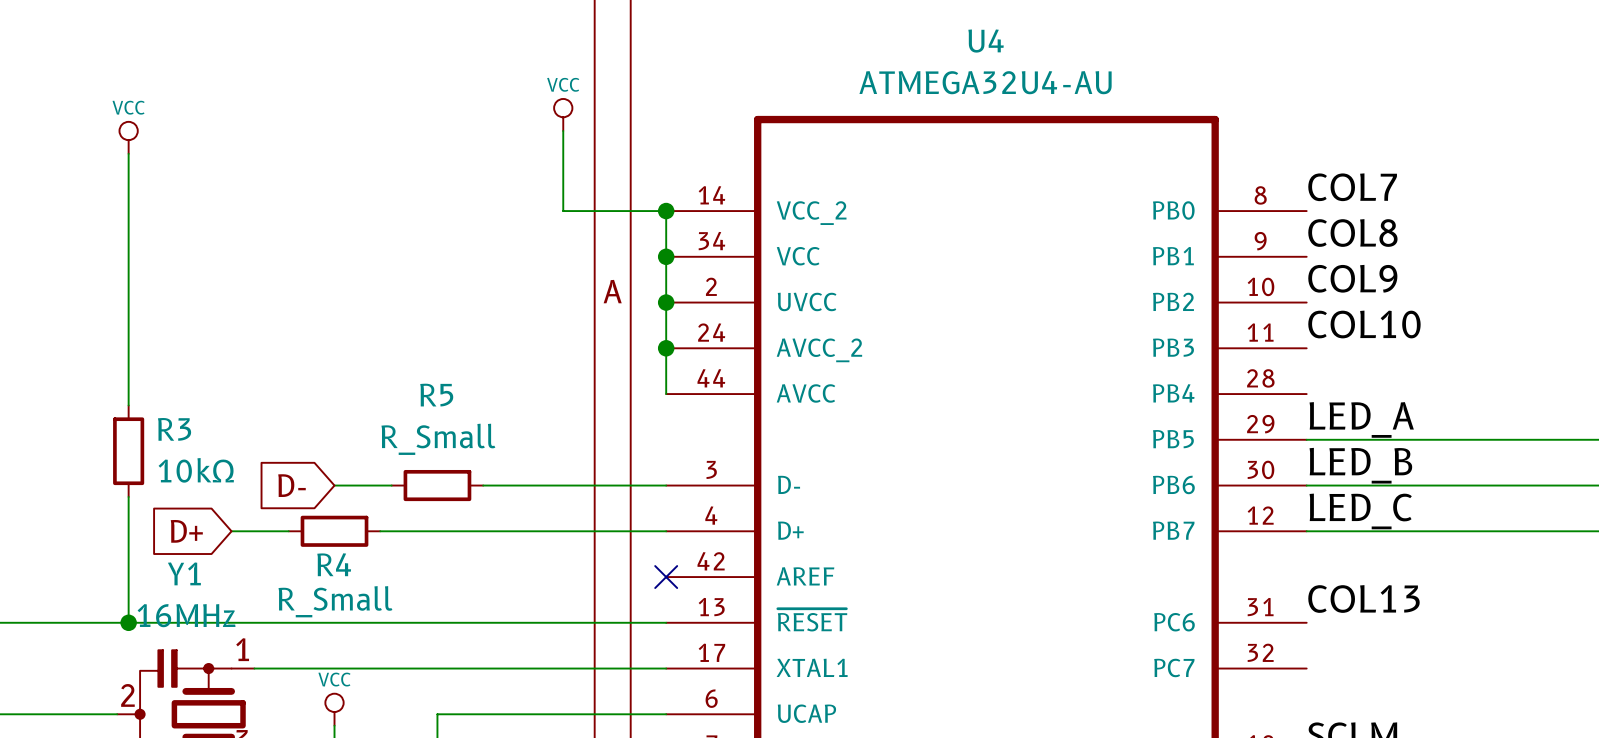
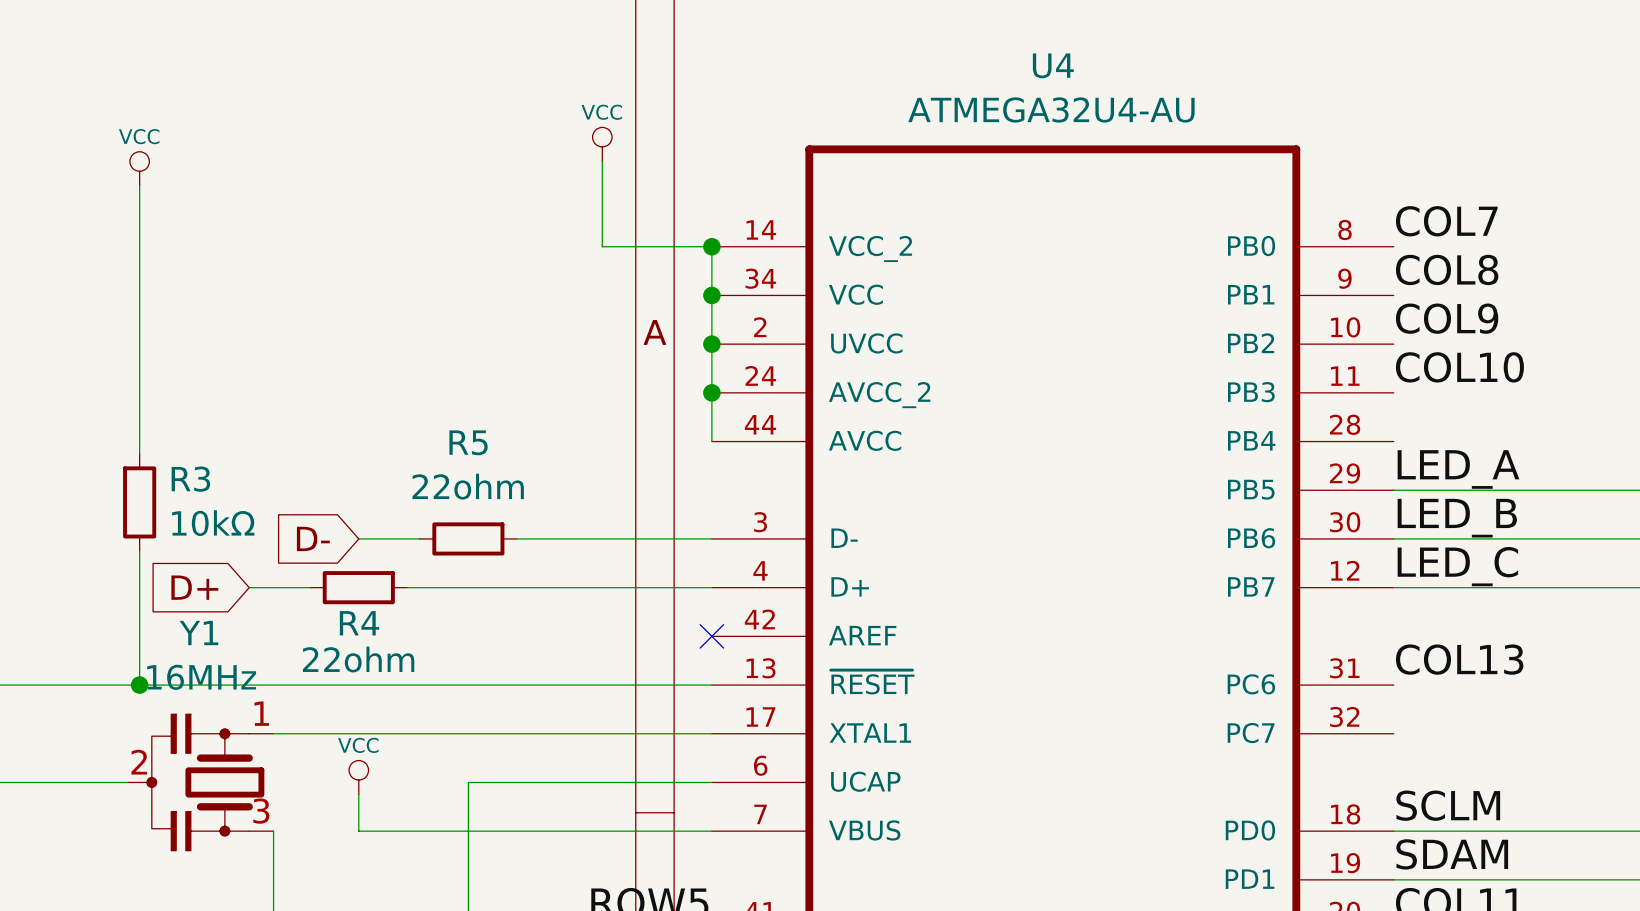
R5 value: R_Small (438, 439) -> 22ohm (468, 486)
R4 value: R_Small (335, 601) -> 22ohm (358, 659)

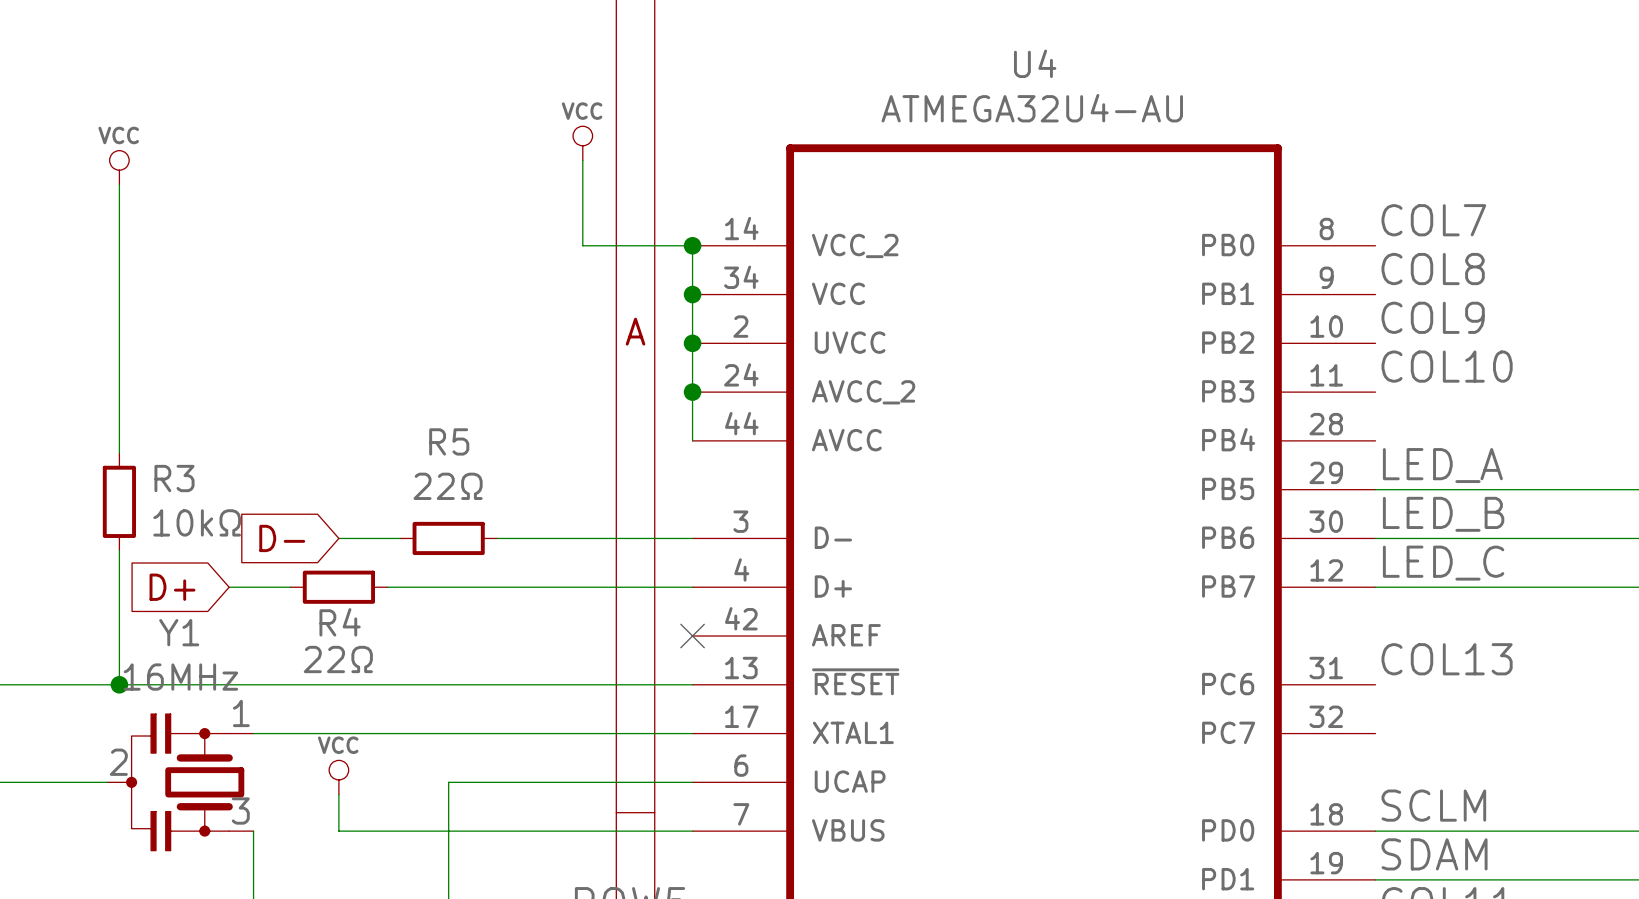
R5 value: 22ohm (468, 486) -> 22Ω (448, 486)
R4 value: 22ohm (358, 659) -> 22Ω (338, 659)

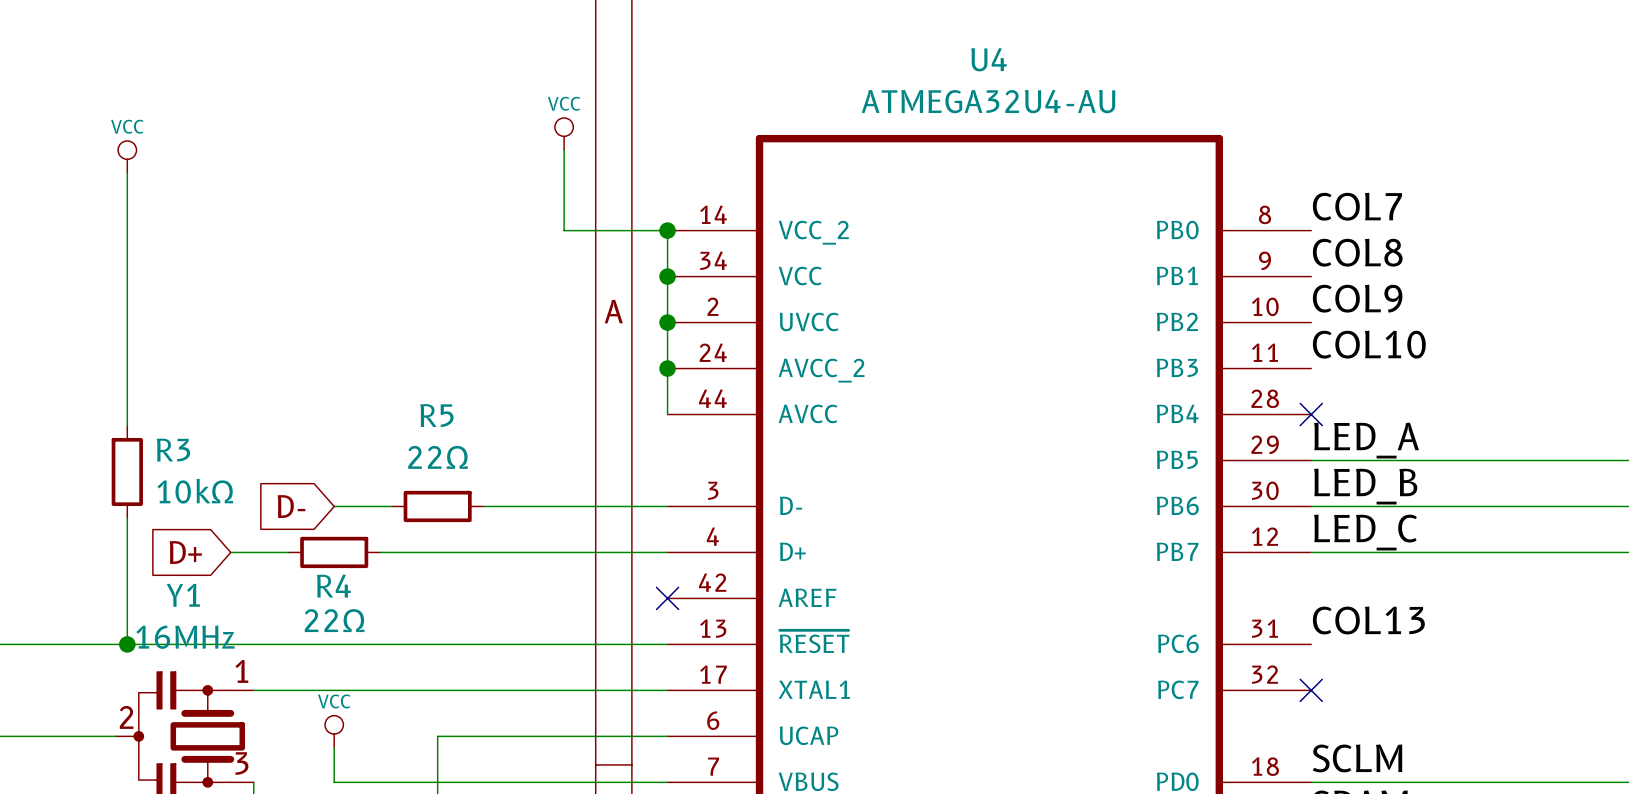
no-connect mark: none -> (1311, 414)
no-connect mark: none -> (1311, 690)

